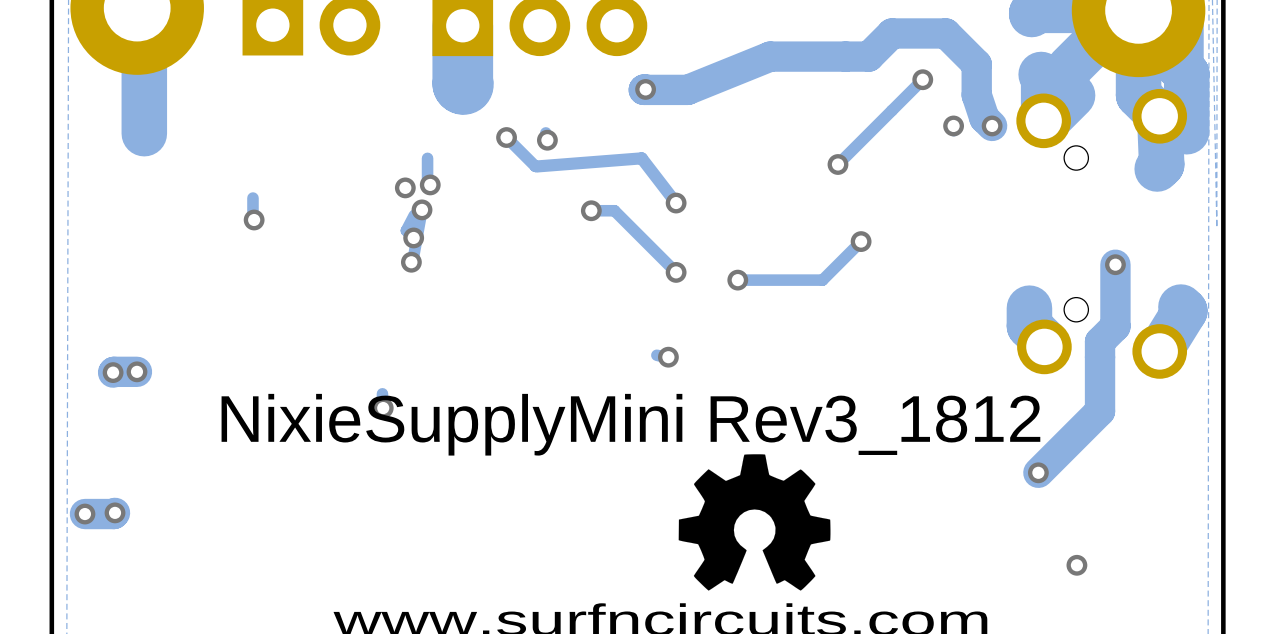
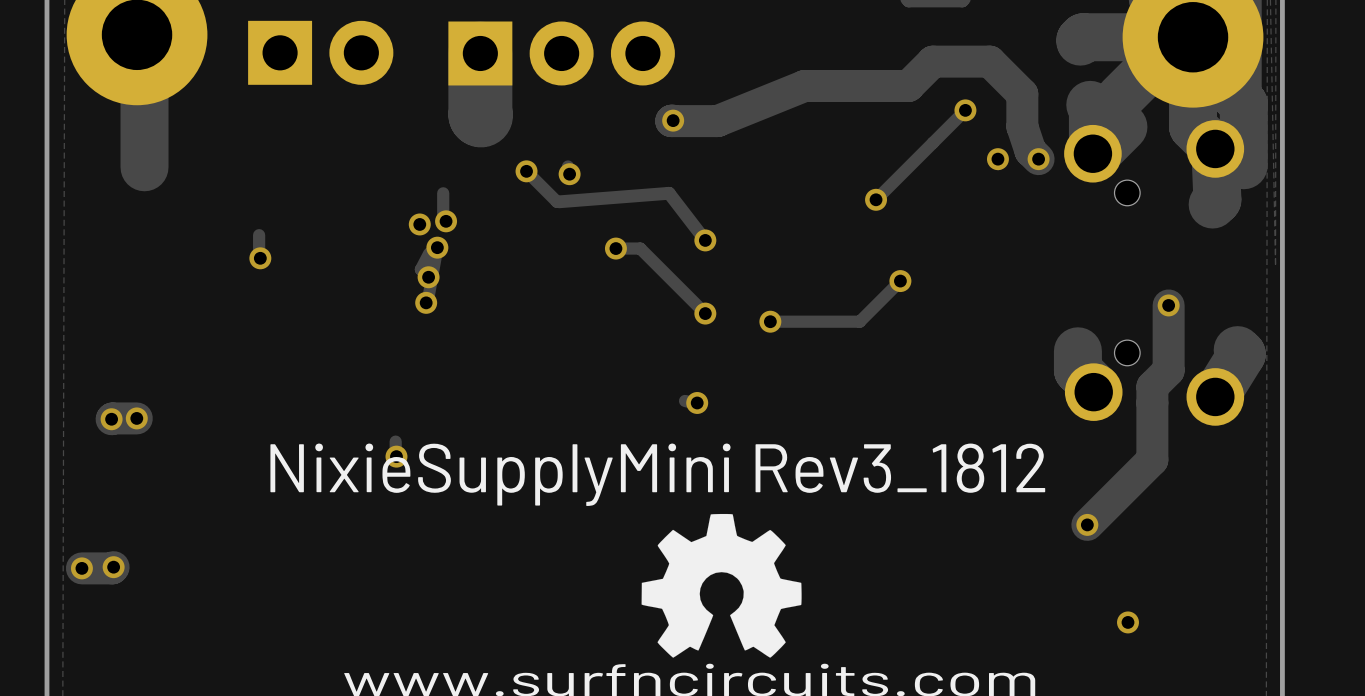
drawing position: (754, 522) -> (721, 585)

